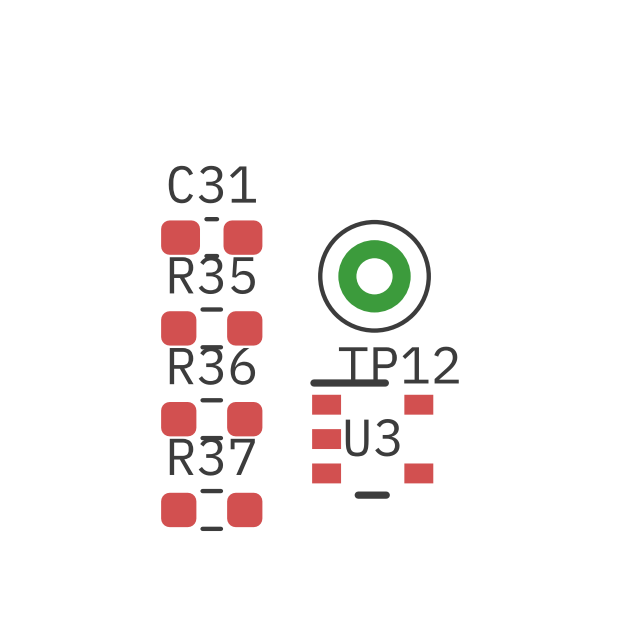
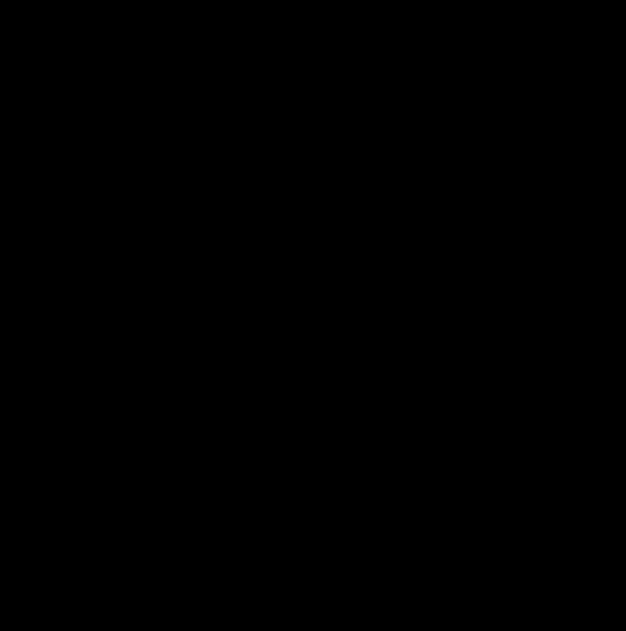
C31: (211, 237) -> none
TP12: (374, 276) -> none
R35: (211, 328) -> none
R36: (211, 419) -> none
U3: (371, 439) -> none
R37: (211, 509) -> none

